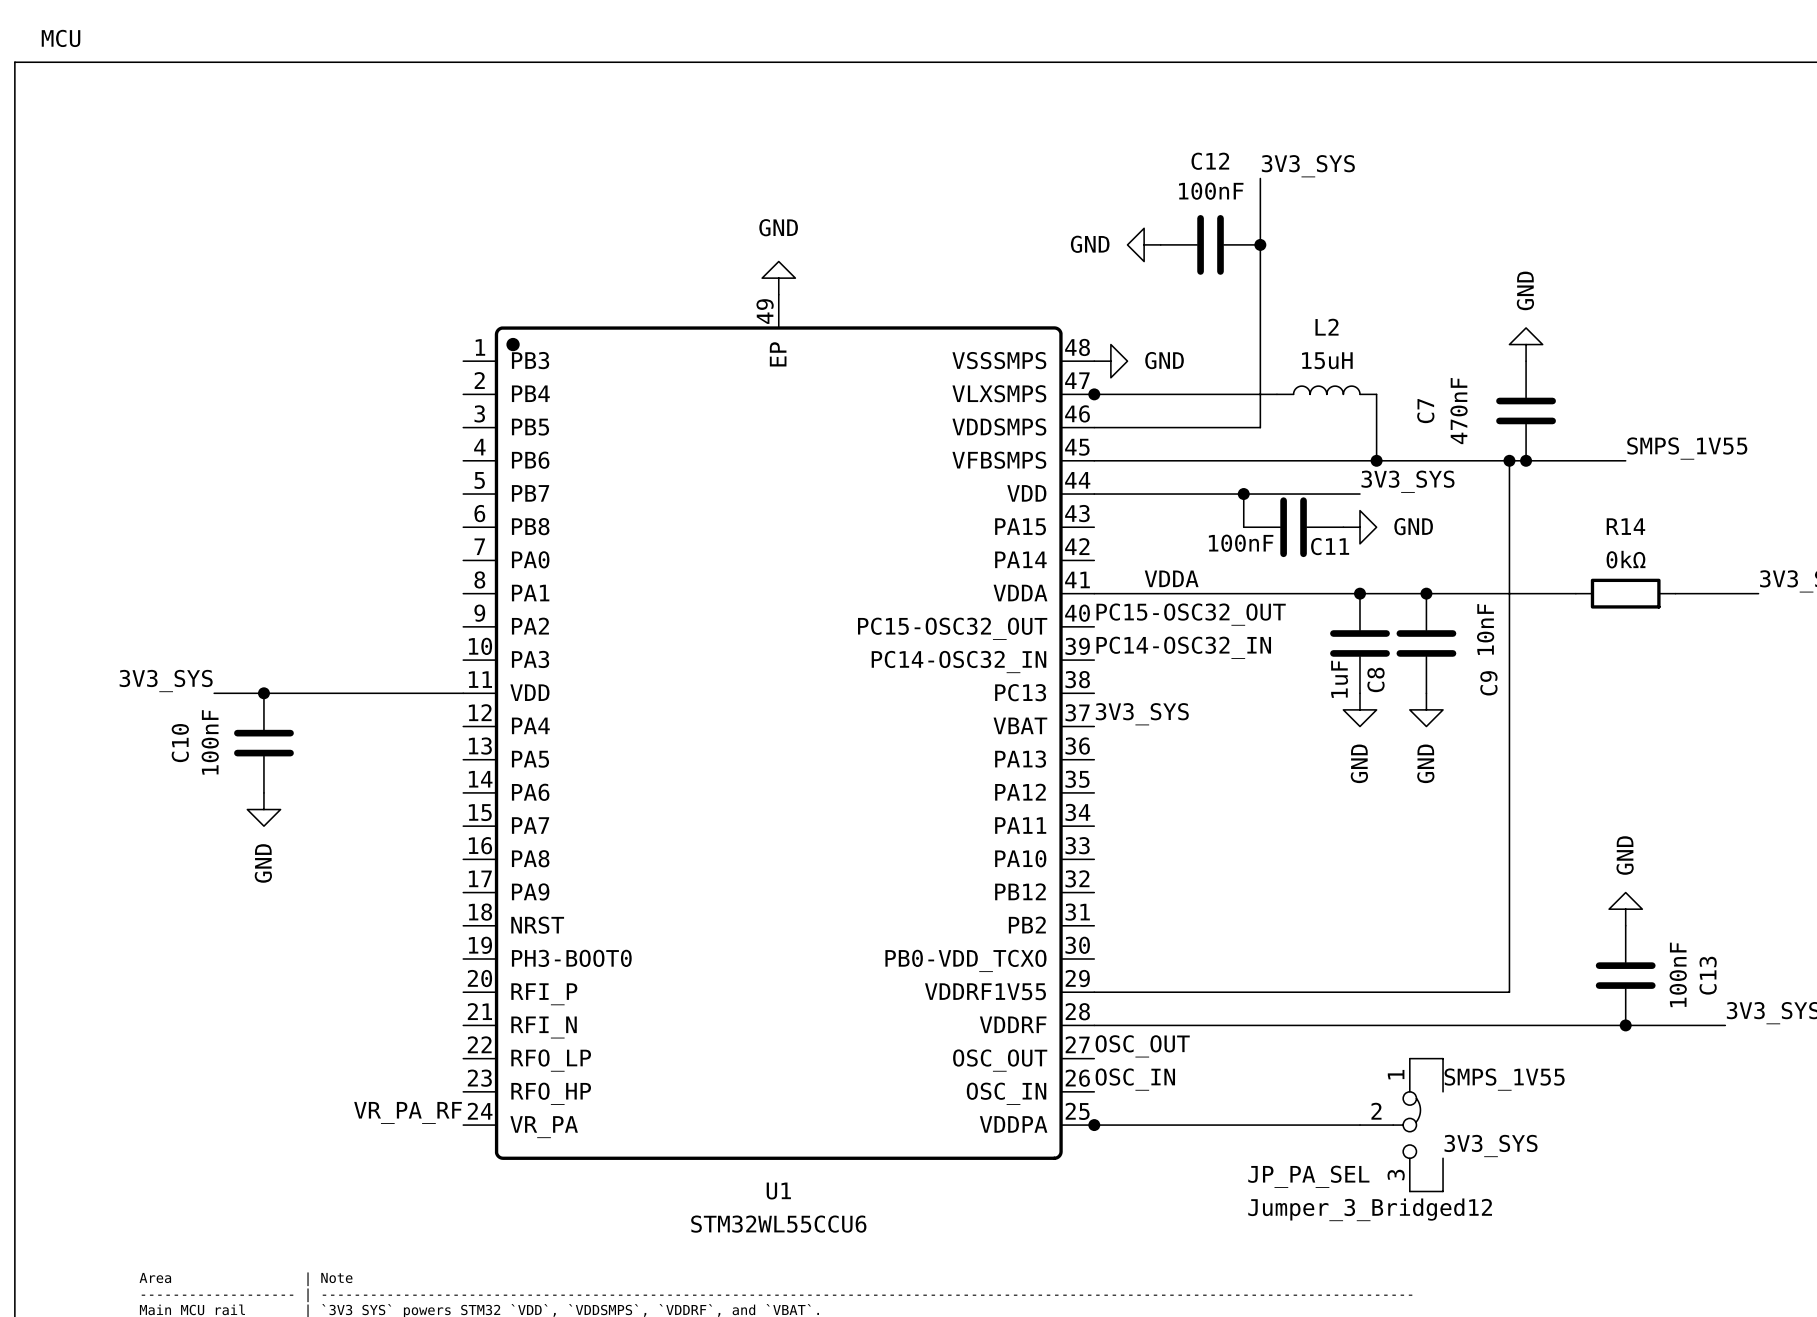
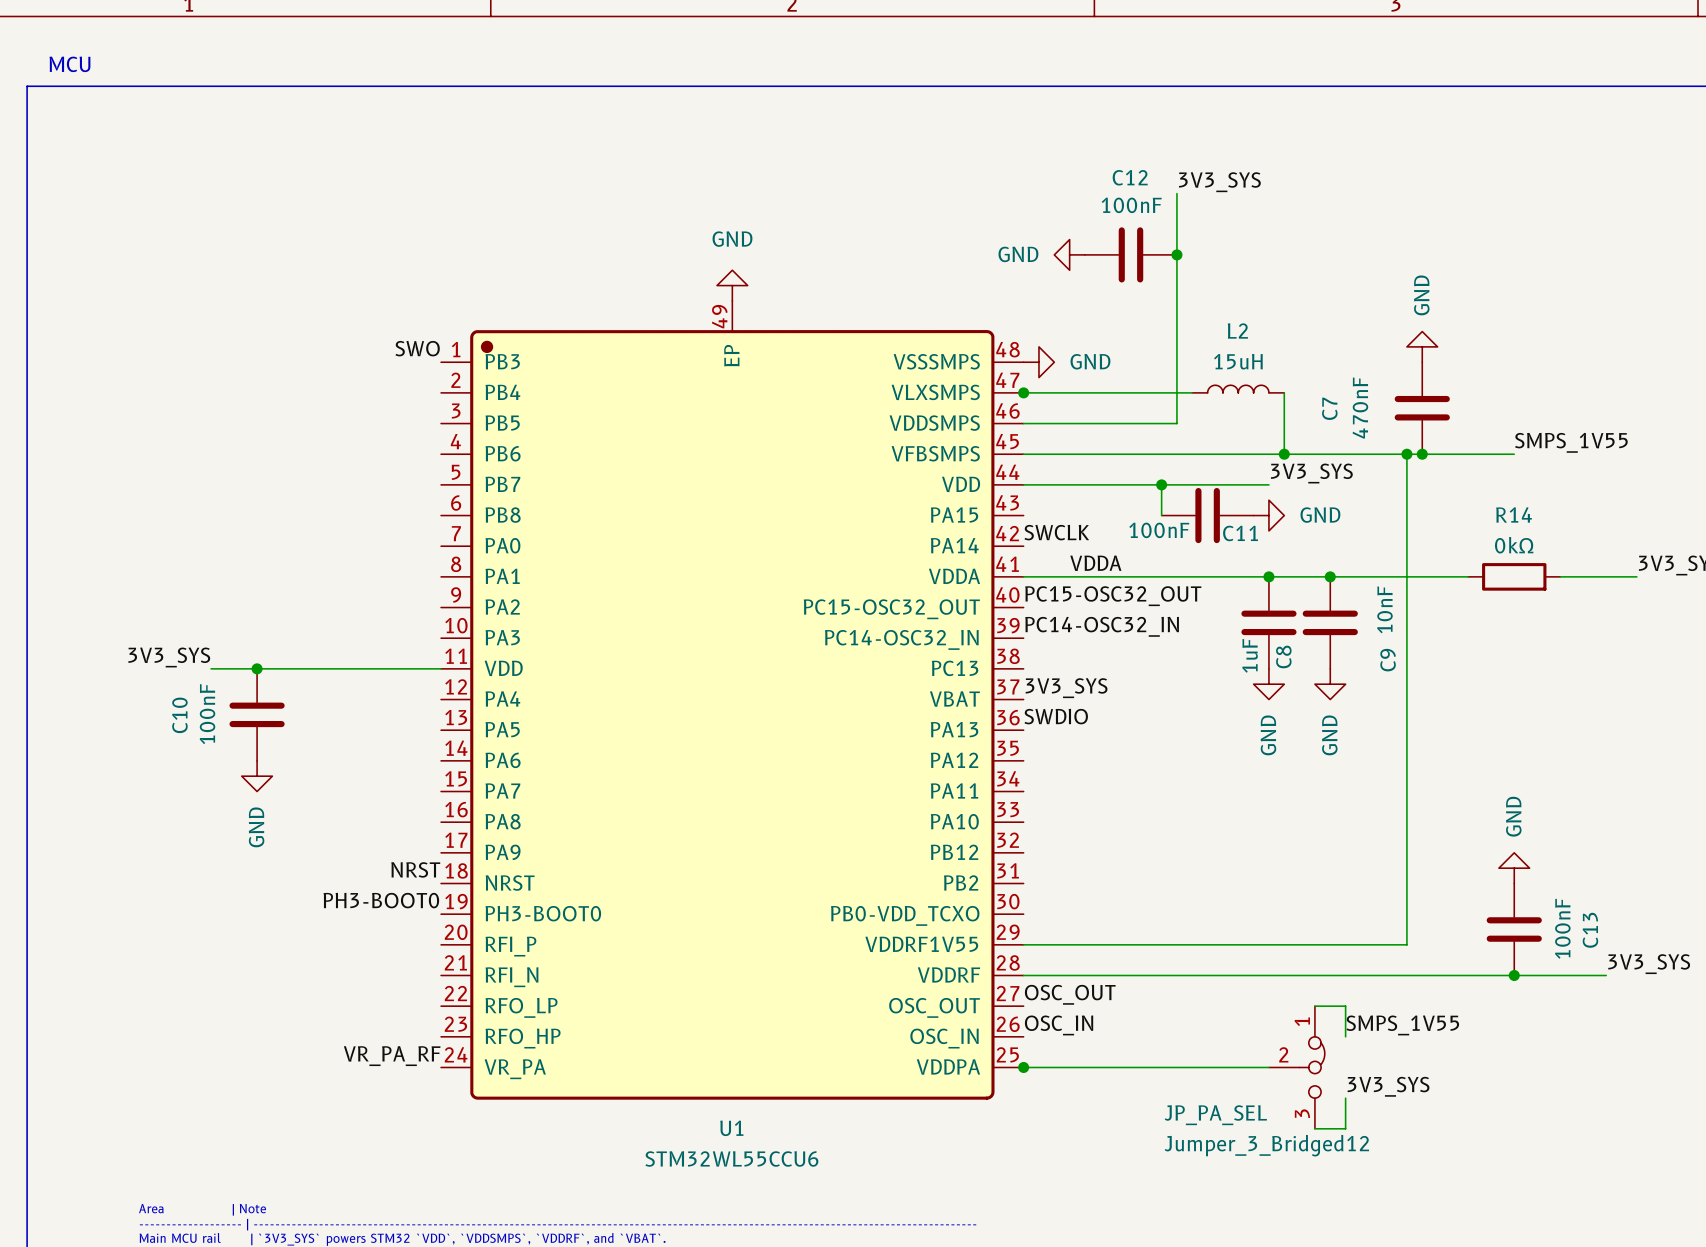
label: none -> SWO (417, 348)
label: none -> SWCLK (1056, 532)
label: none -> SWDIO (1056, 716)
label: none -> NRST (415, 869)
label: none -> PH3-BOOT0 (381, 900)

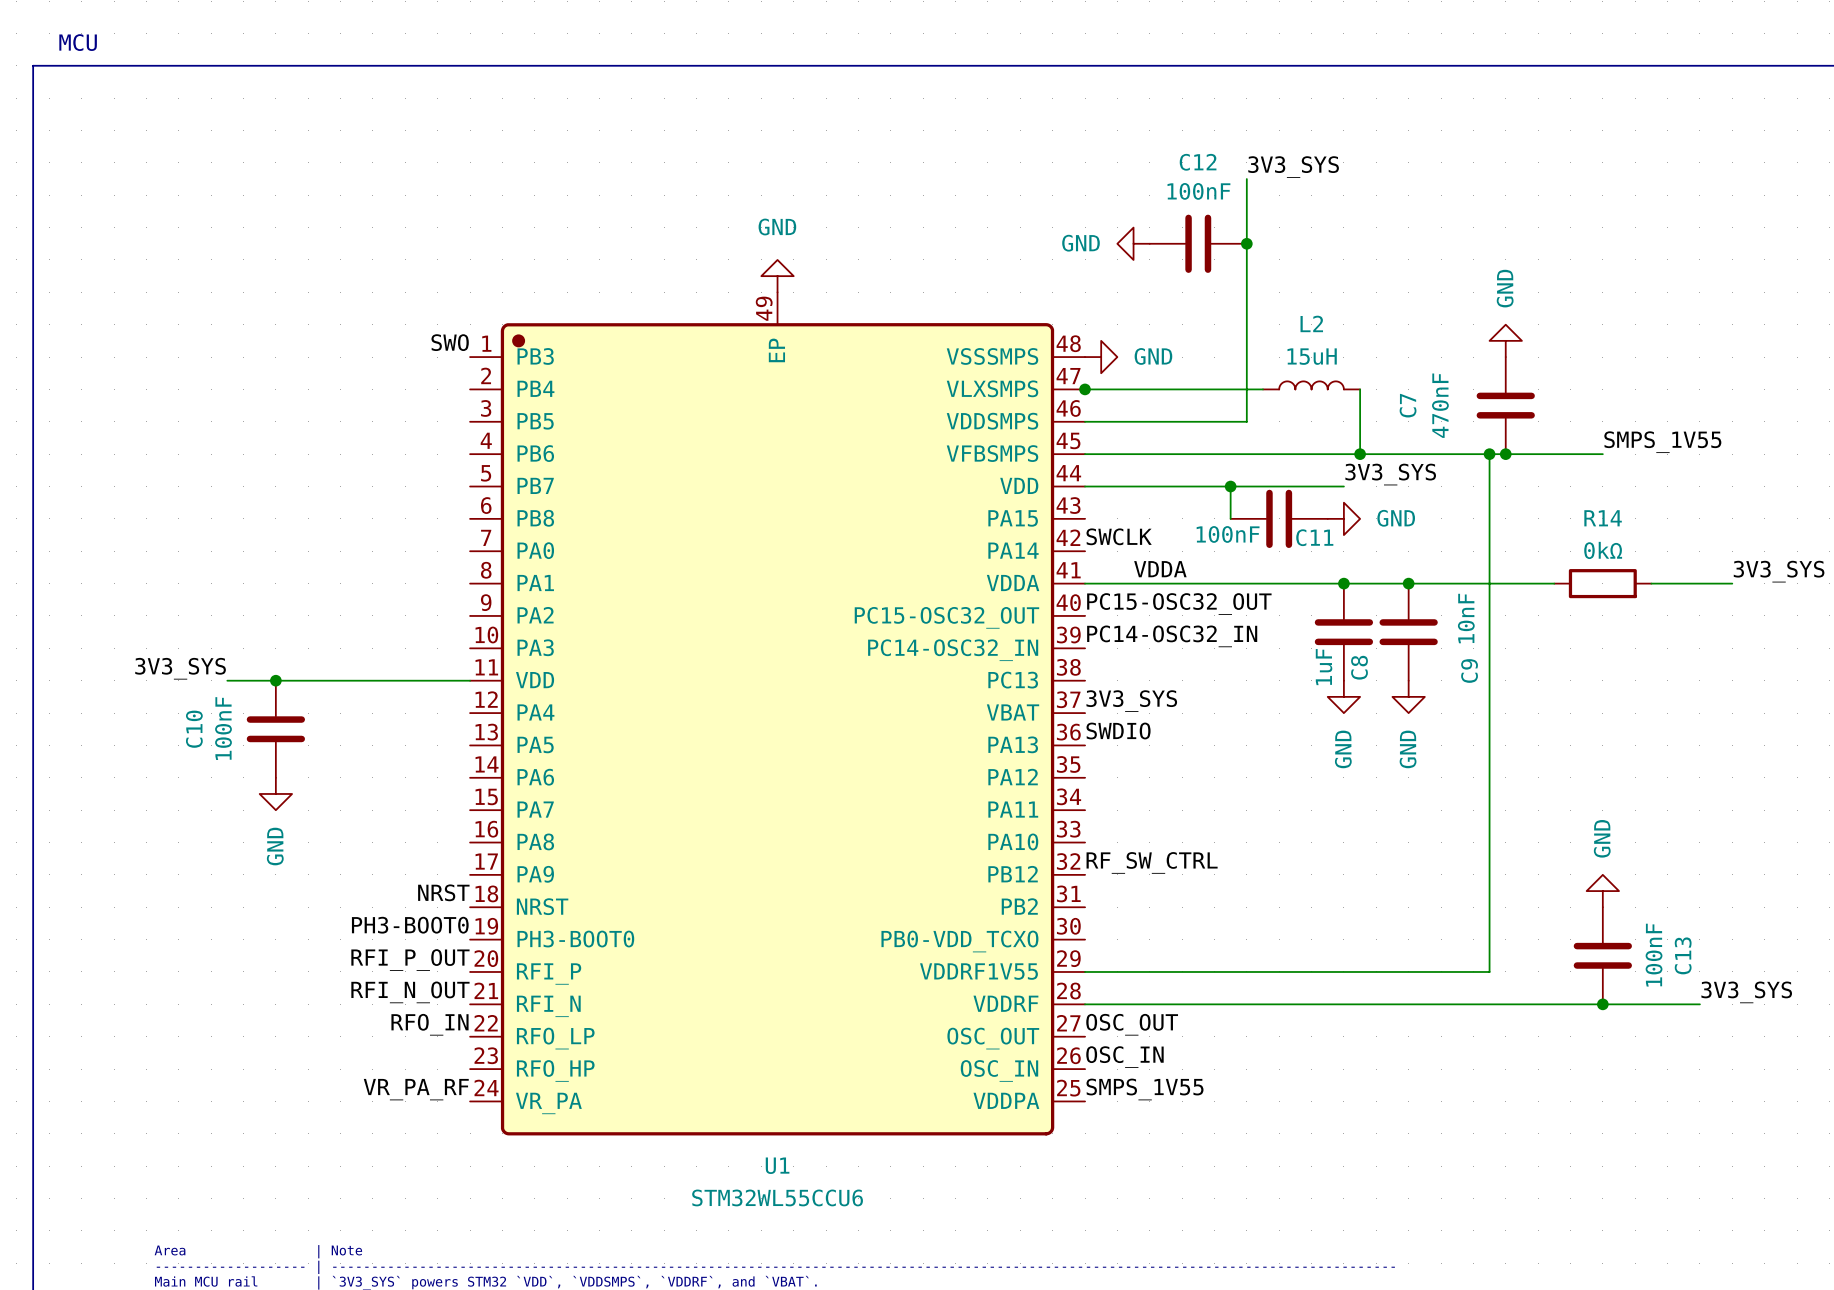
label: none -> RF_SW_CTRL (1152, 862)
label: none -> RFI_P_OUT (410, 960)
label: none -> RFI_N_OUT (410, 992)
label: none -> RFO_IN (429, 1024)
wire: (1314, 1006) (1345, 1006) (1345, 1036) -> none
label: SMPS_1V55 (1402, 1025) -> none
label: none -> SMPS_1V55 (1144, 1089)
wire: (1023, 1067) (1268, 1067) -> none
junction: (1023, 1067) -> none
JP_PA_SEL: Jumper_3_Bridged12 (1296, 1067) -> none
label: 3V3_SYS (1388, 1086) -> none
wire: (1345, 1098) (1345, 1128) (1314, 1128) -> none

